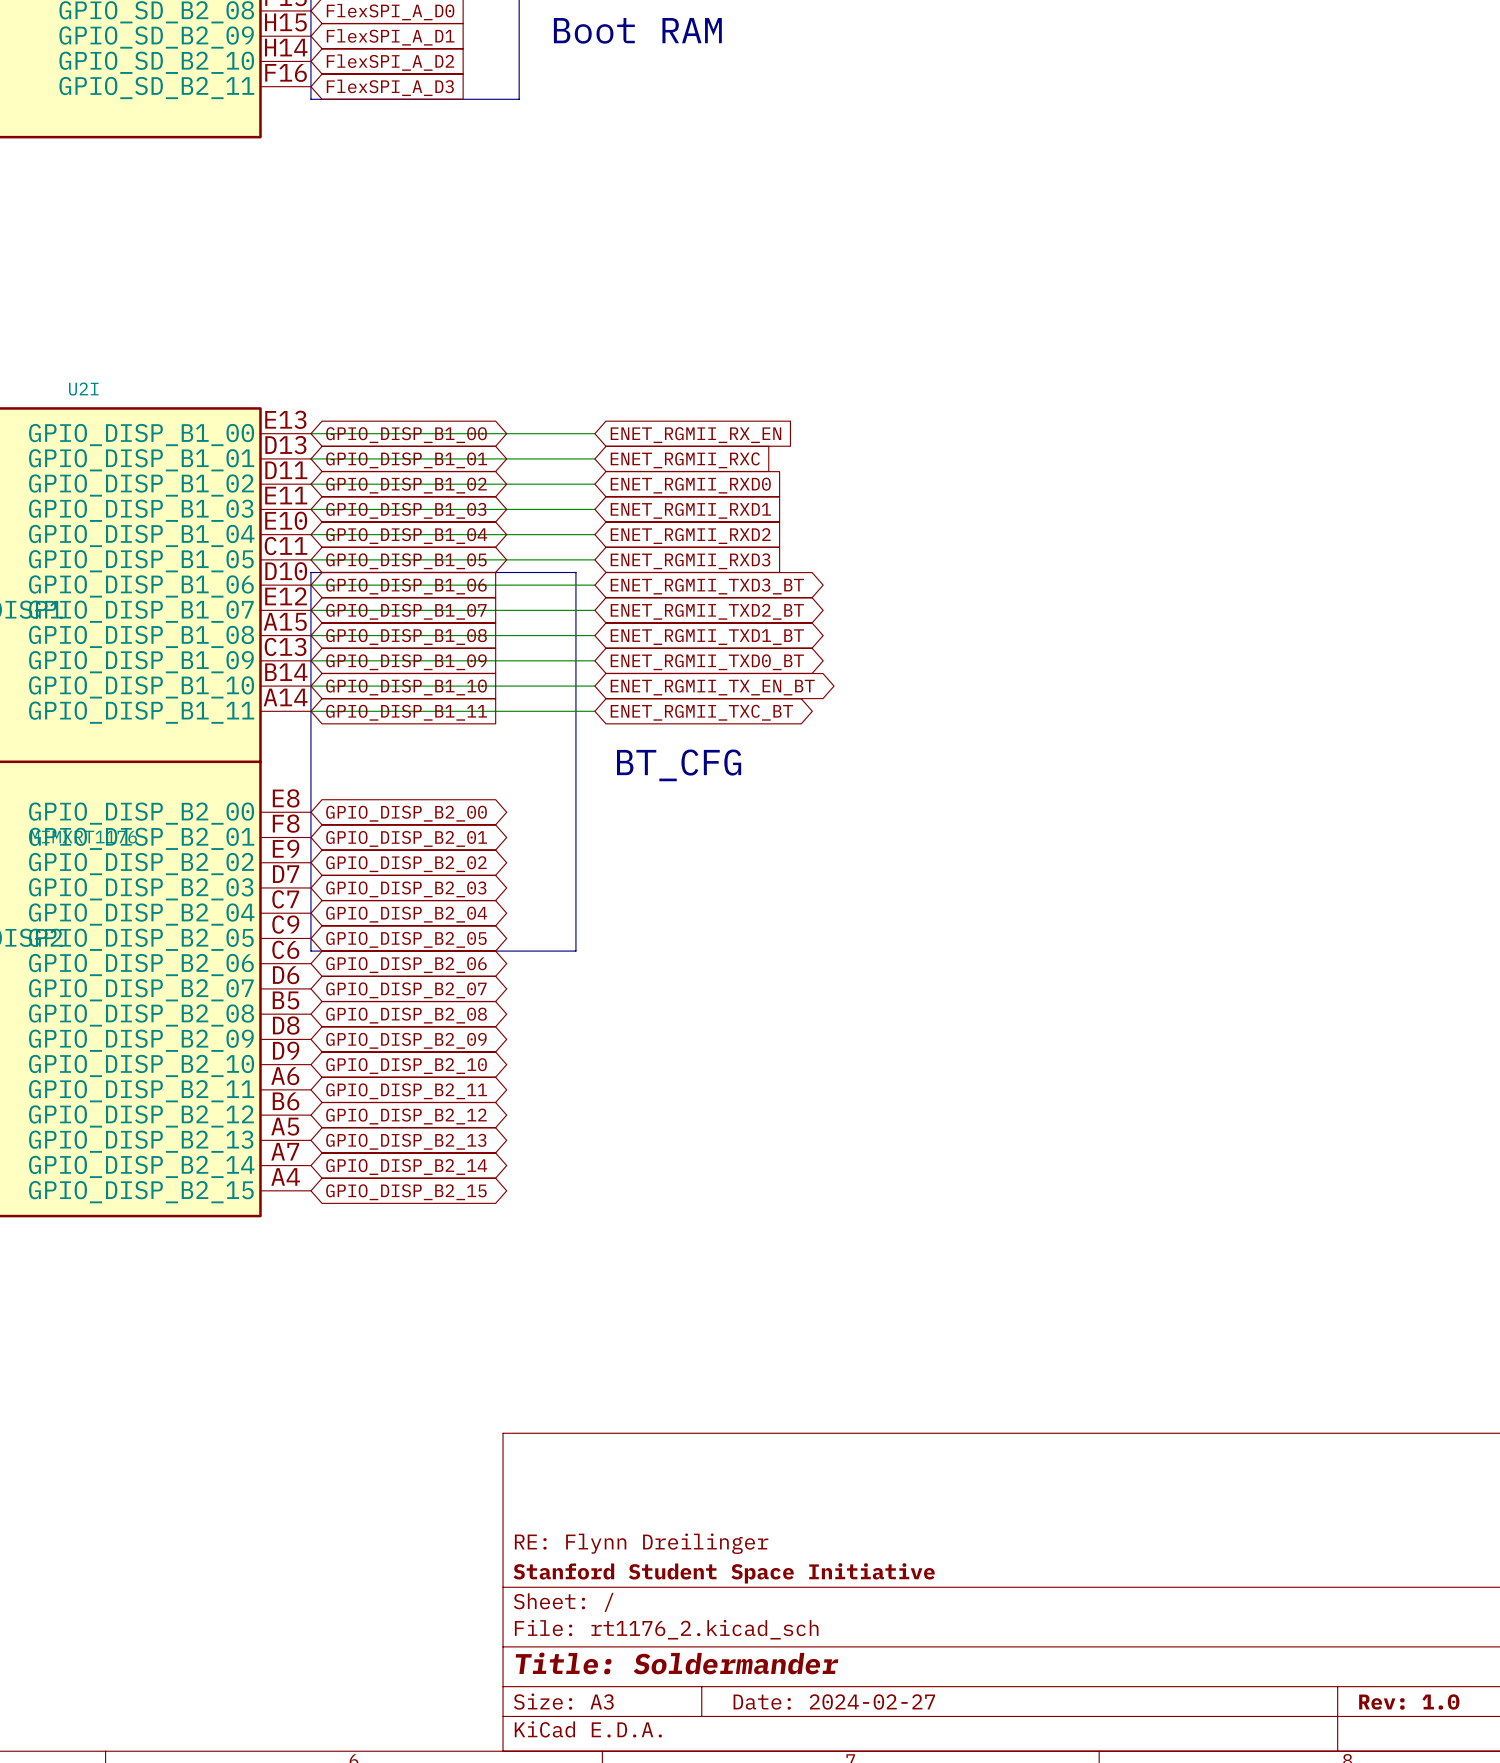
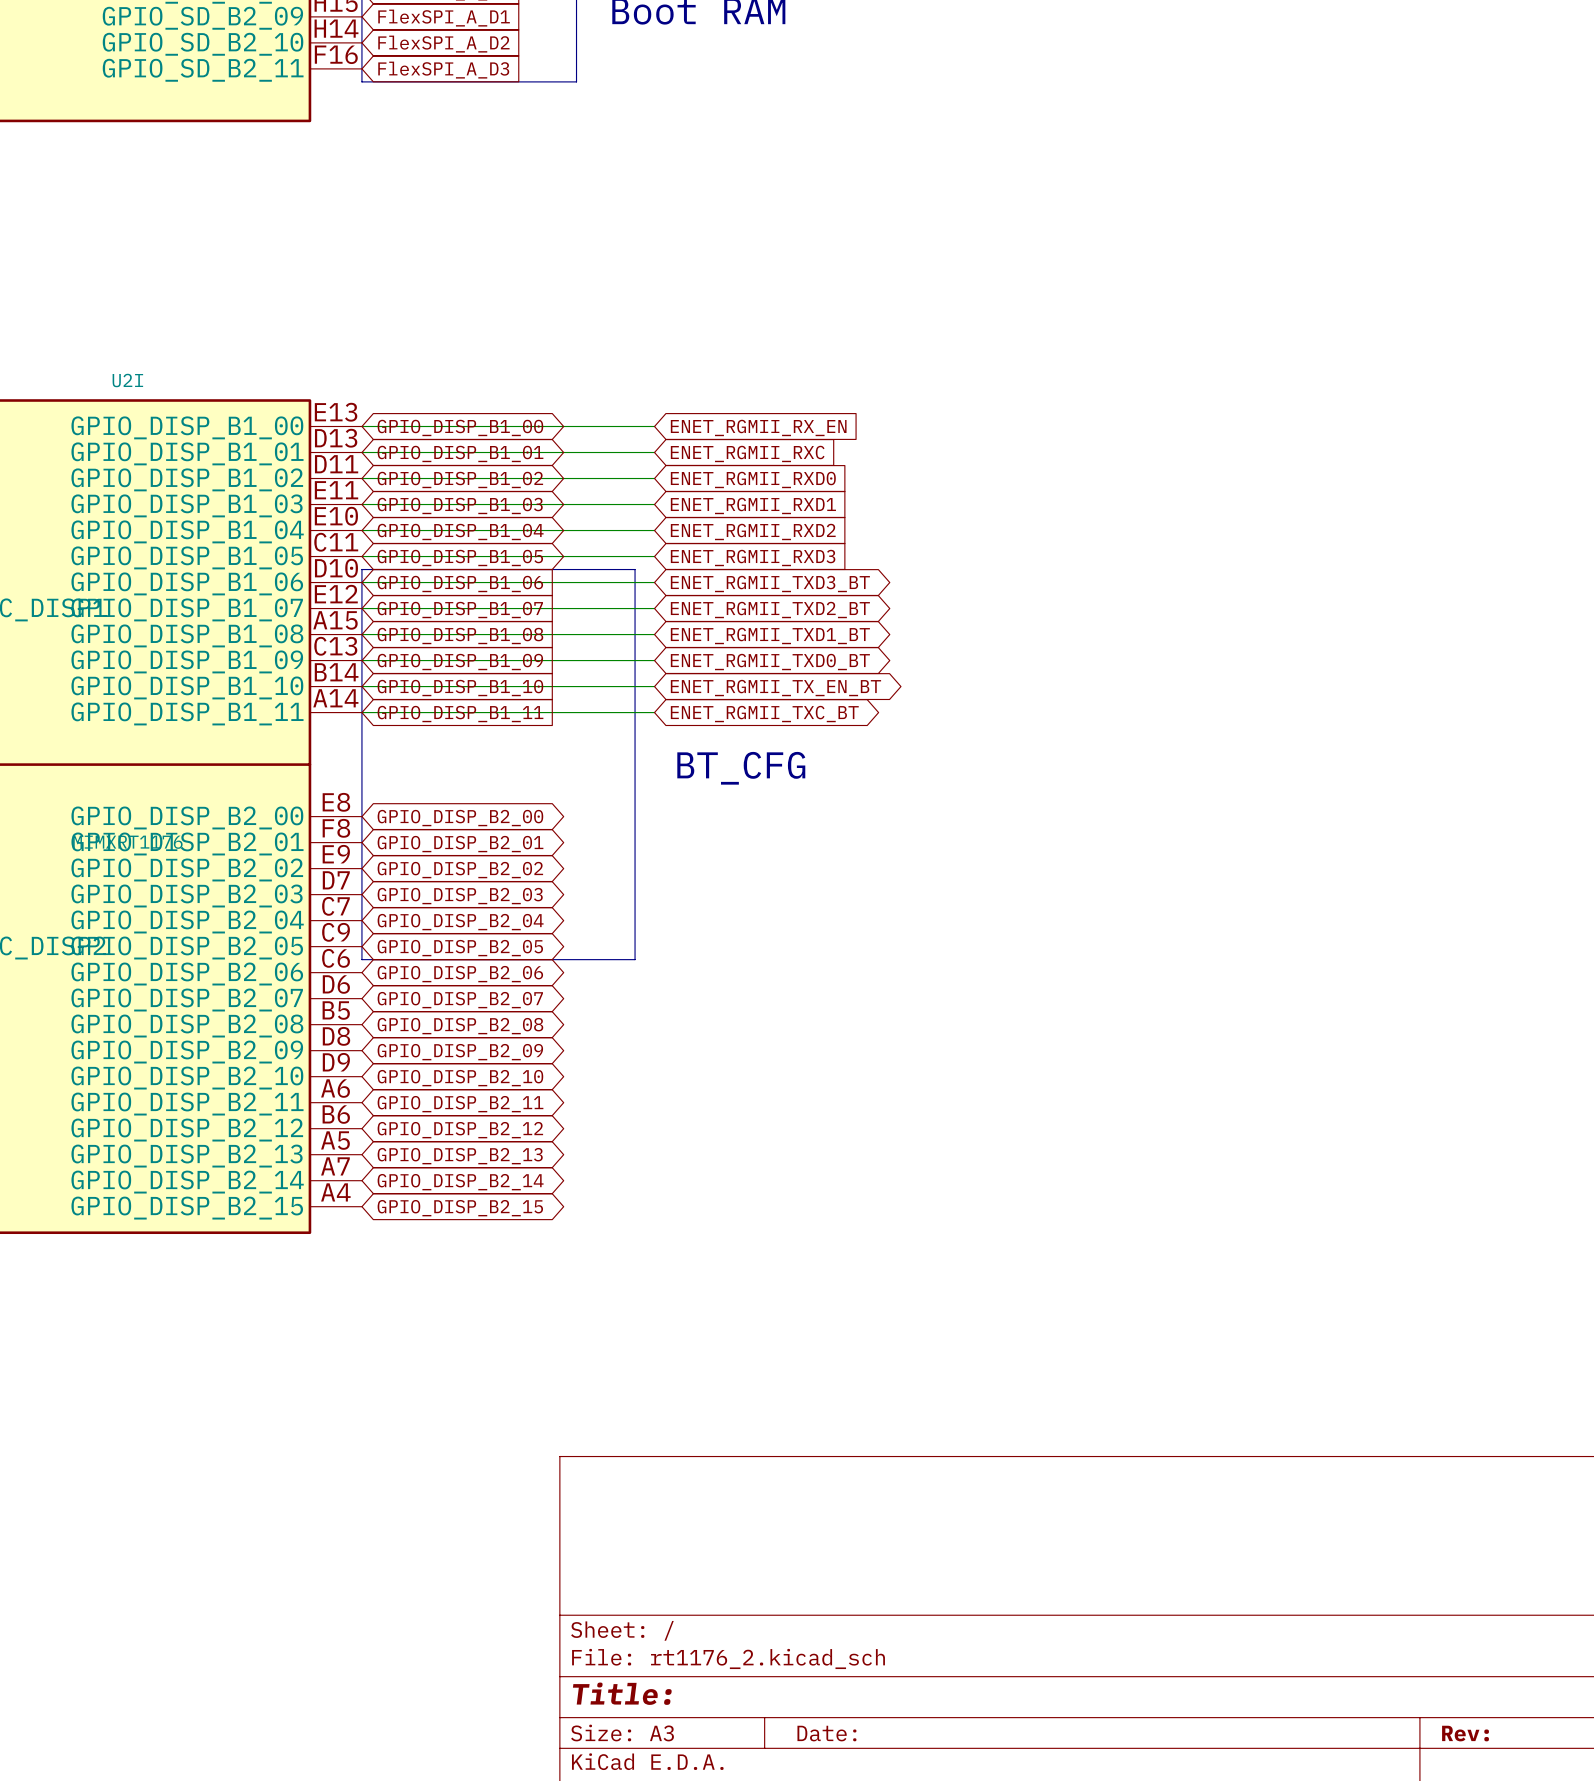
title block: RE: Flynn Dreilinger (641, 1543) -> none
title block: Stanford Student Space Initiative (724, 1573) -> none
title block: Title: Soldermander (676, 1663) -> Title: (622, 1693)
title block: Date: 2024-02-27 (834, 1701) -> Date: (826, 1733)
title block: Rev: 1.0 (1409, 1701) -> Rev: (1465, 1733)

